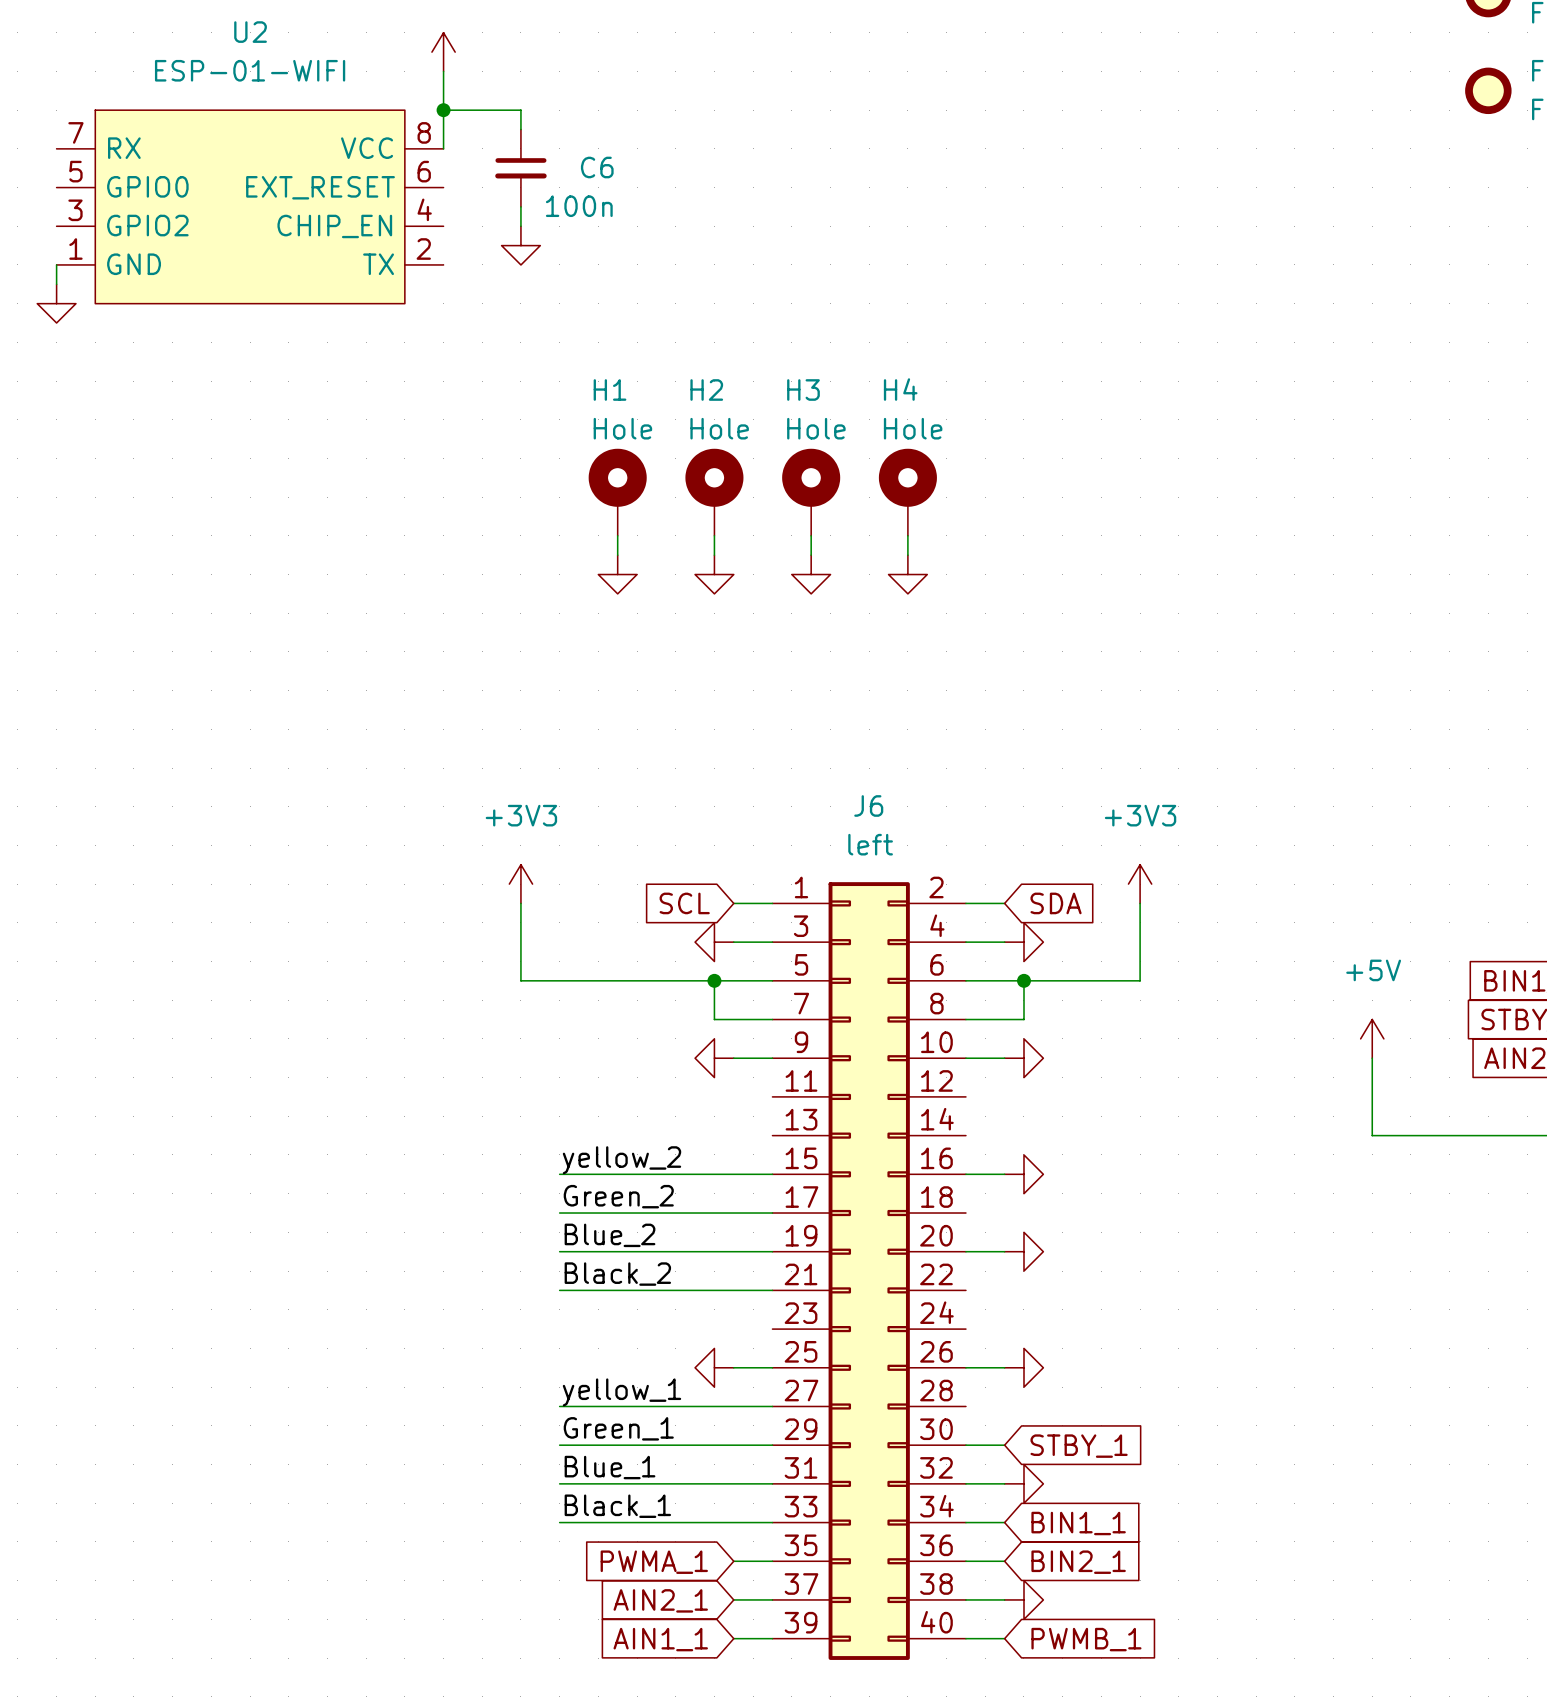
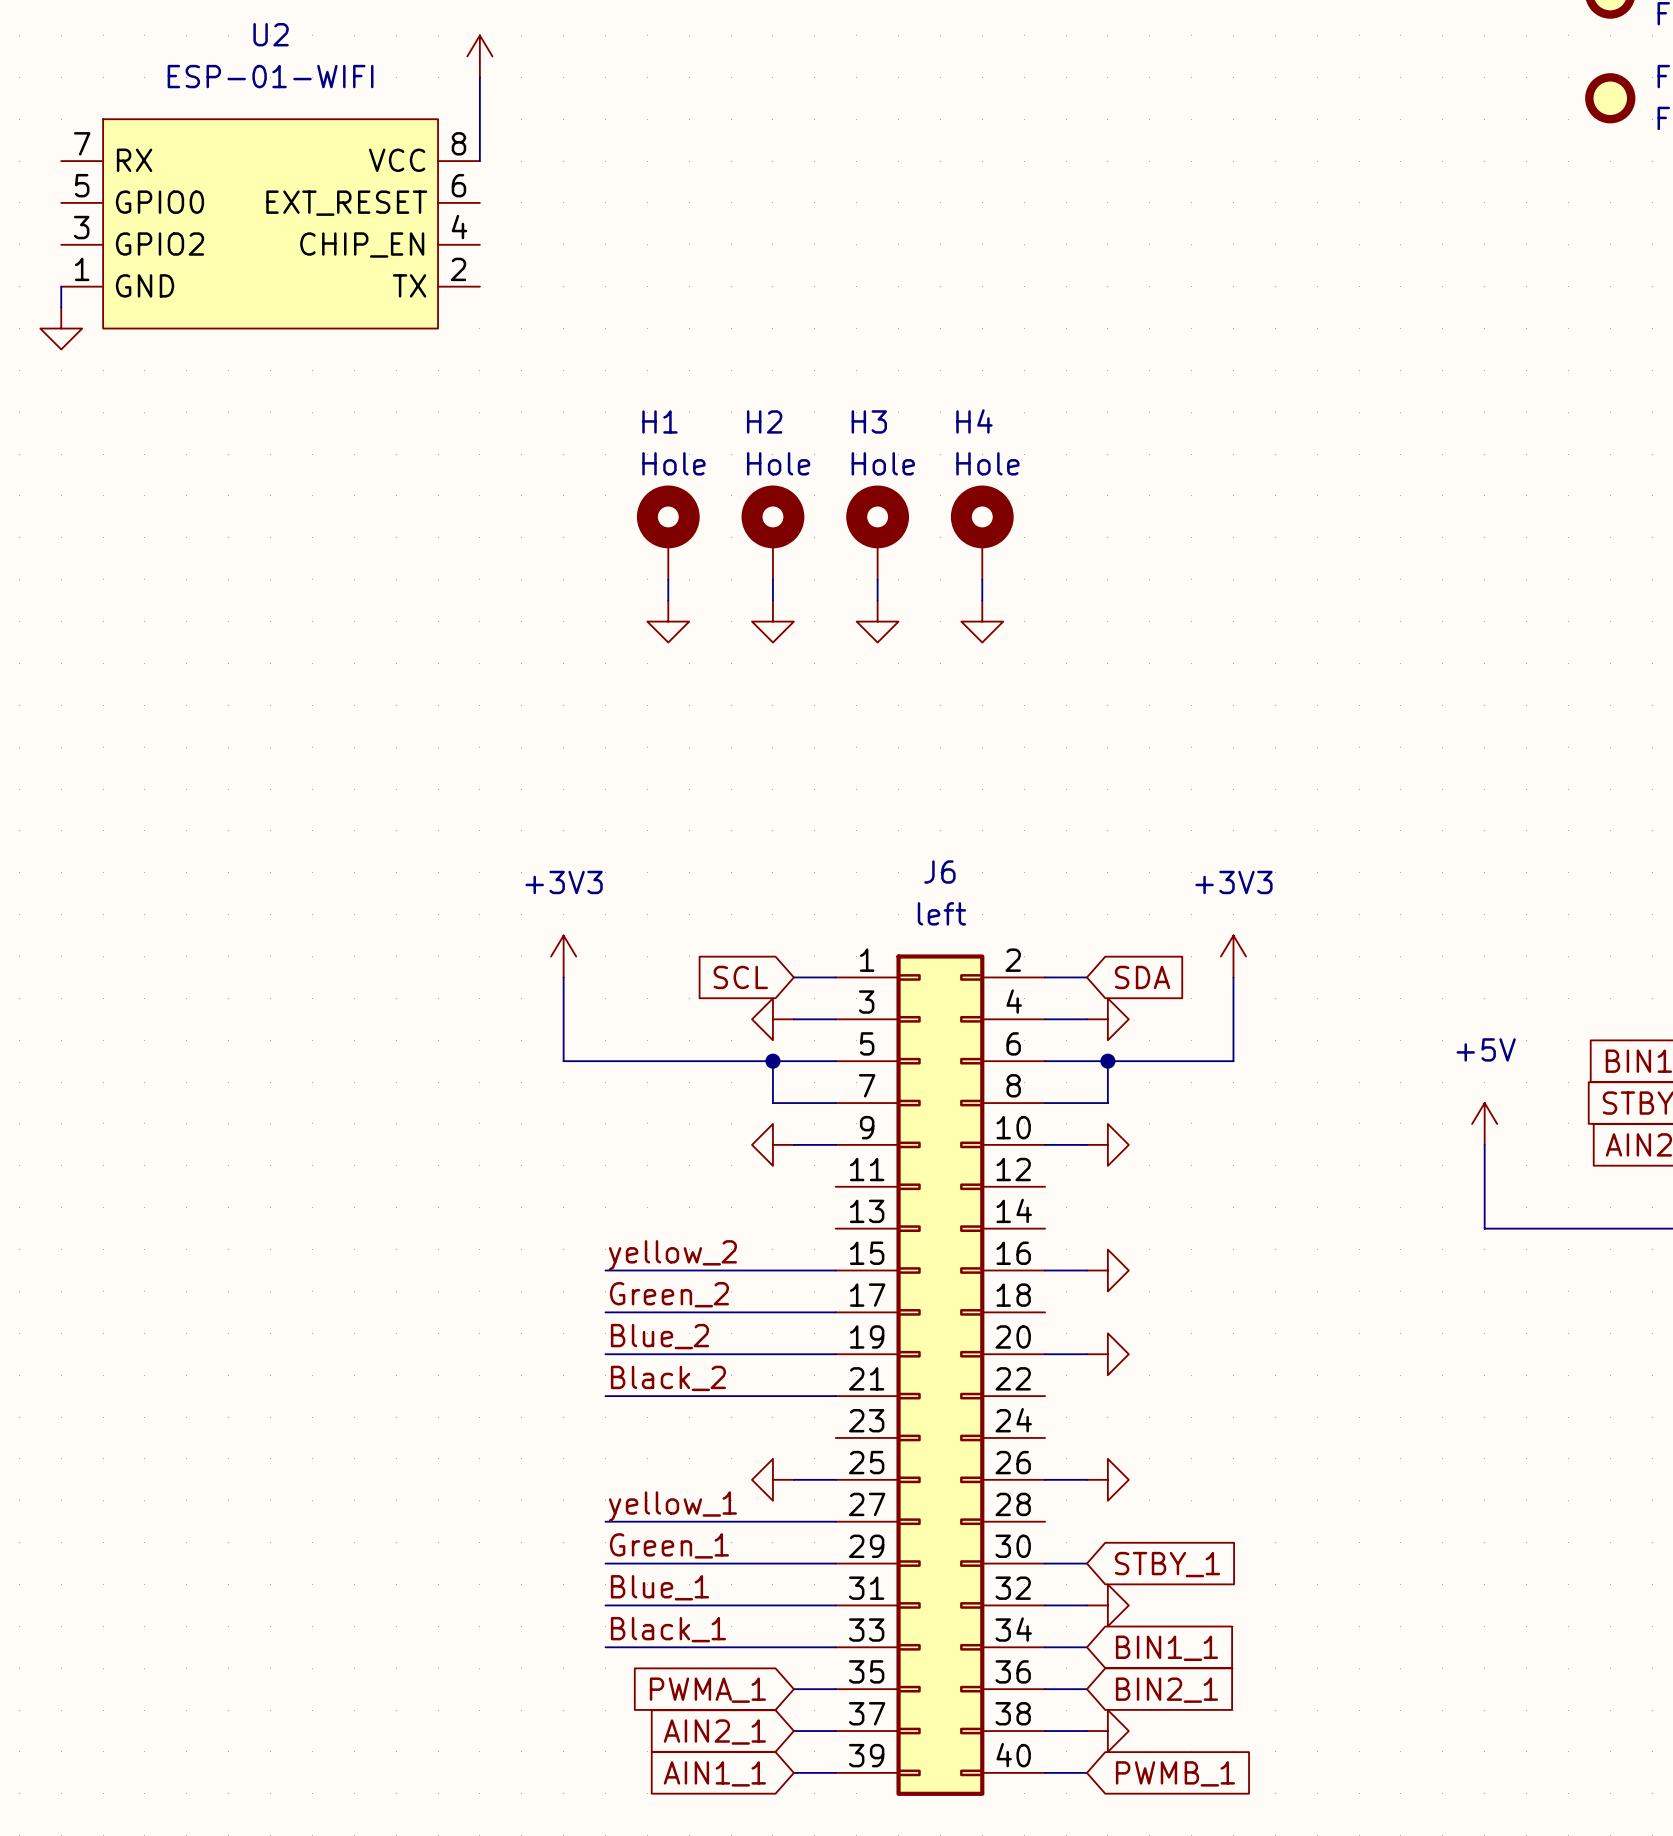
wire: (443, 110) (520, 110) (520, 129) -> none
junction: (443, 110) -> none
C6: 100n (520, 168) -> none
wire: (520, 206) (520, 226) -> none
power symbol: (520, 245) -> none

